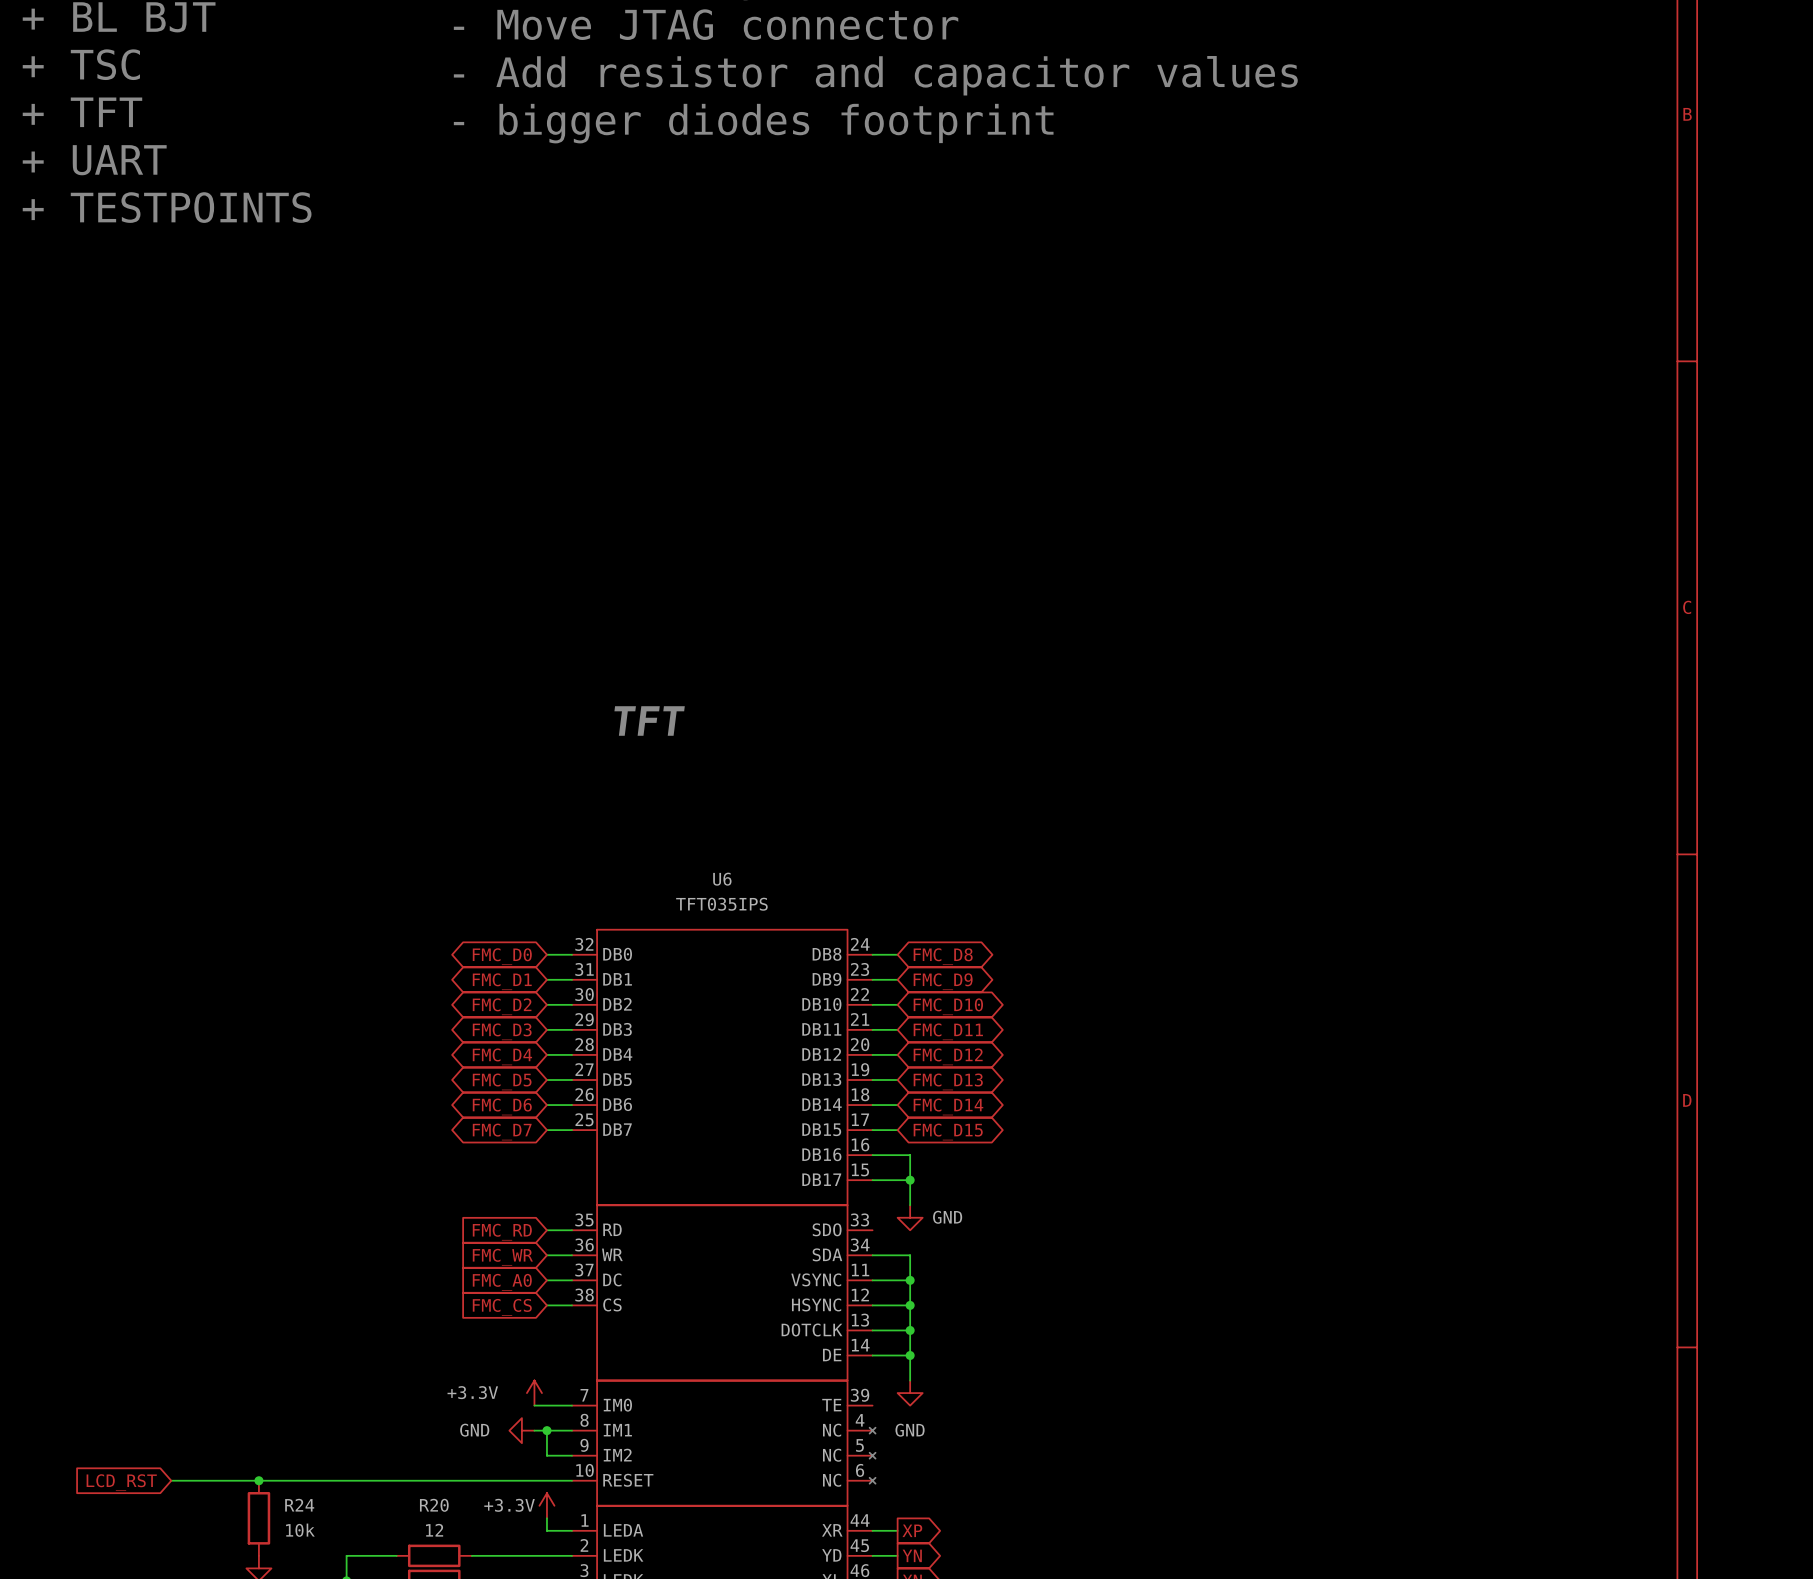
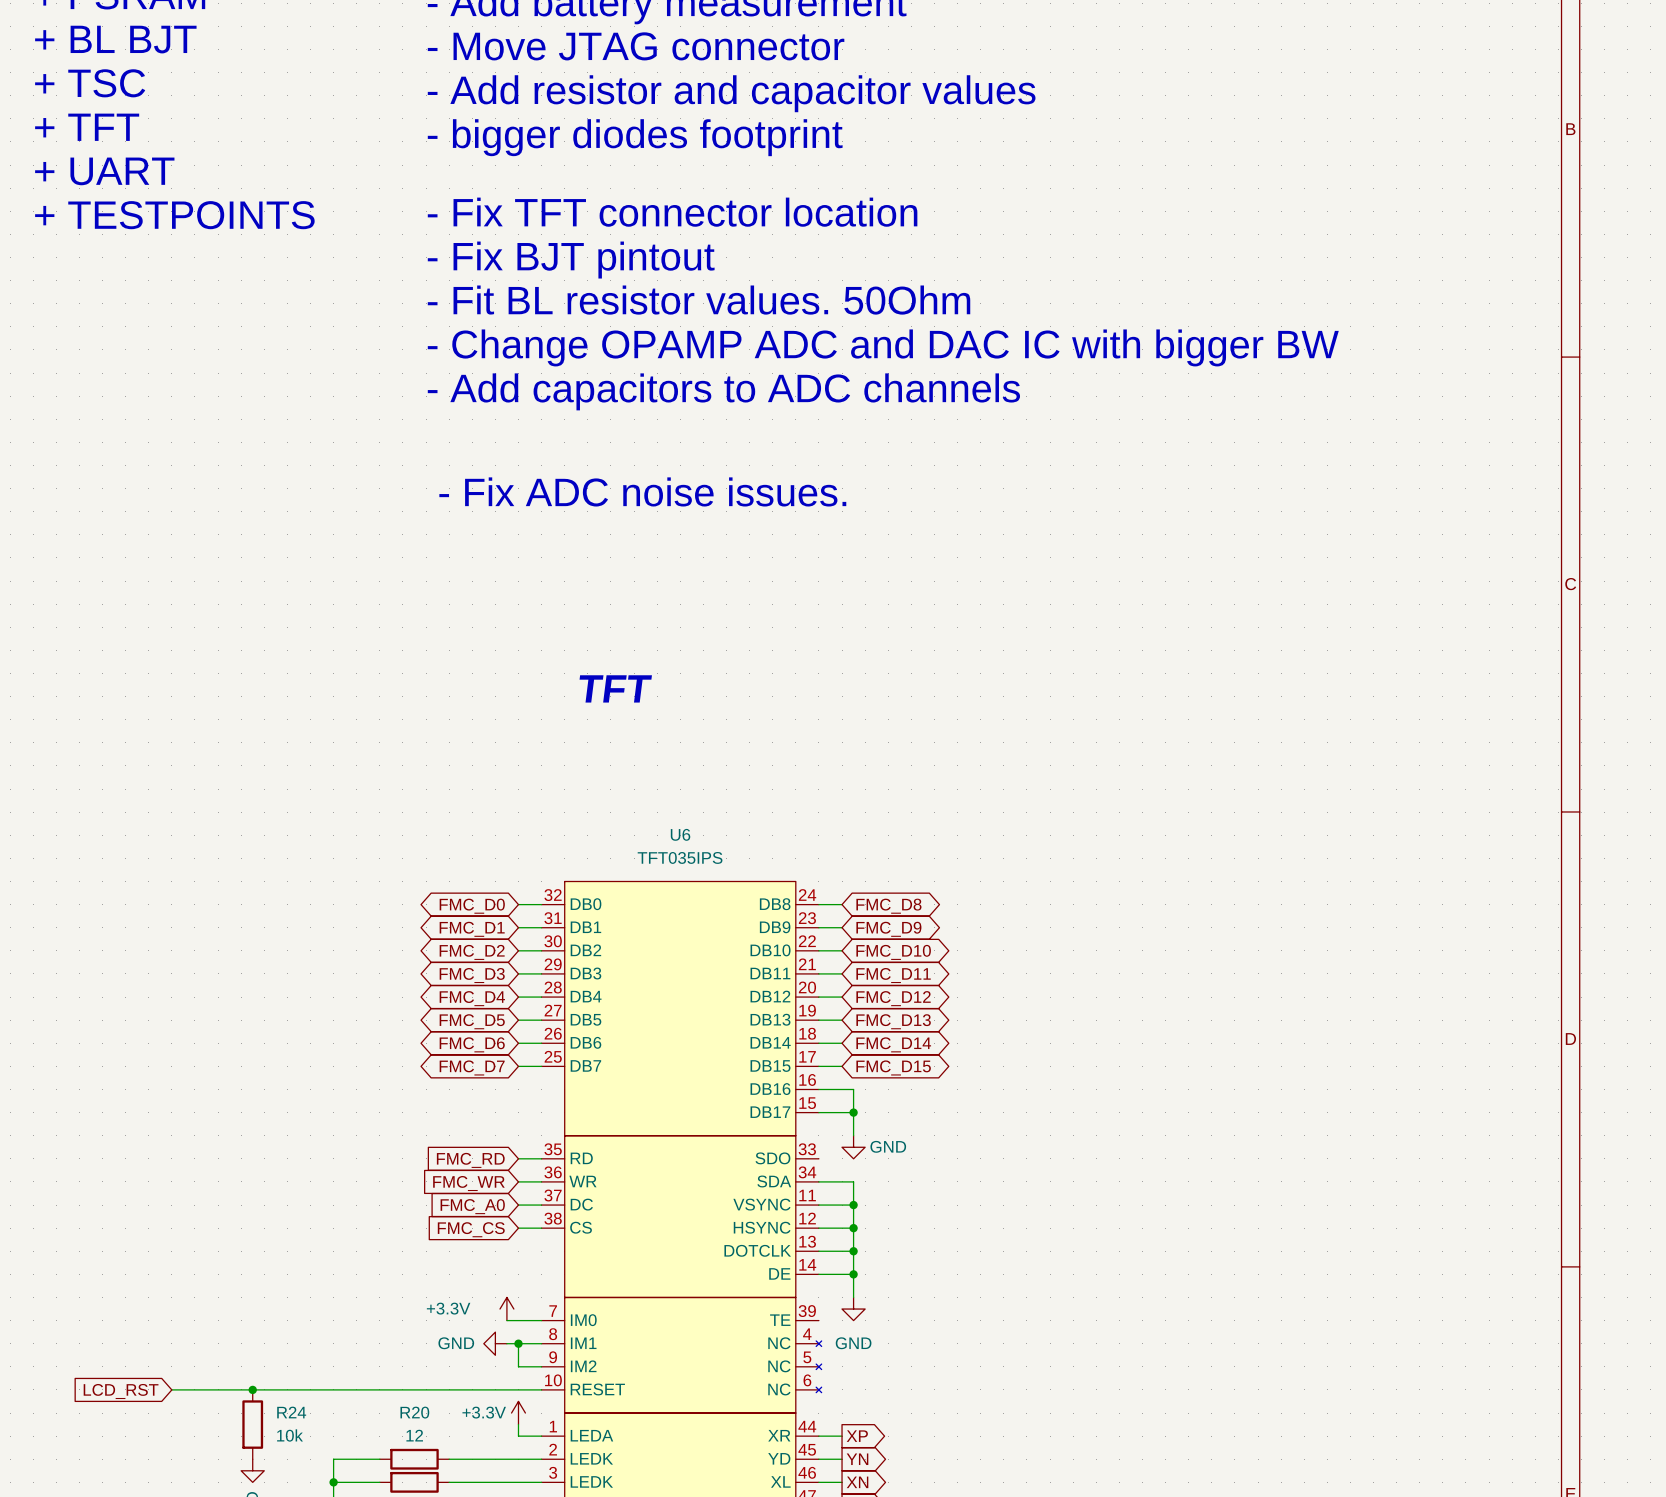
text: none -> - Fix TFT connector location (672, 212)
text: none -> - Fix BJT pintout (571, 260)
text: none -> - Fit BL resistor values. 50Ohm (699, 300)
text: none -> - Change OPAMP ADC and DAC IC with bigger BW (883, 347)
text: none -> - Add capacitors to ADC channels (723, 391)
text: none -> - Fix ADC noise issues. (642, 491)

